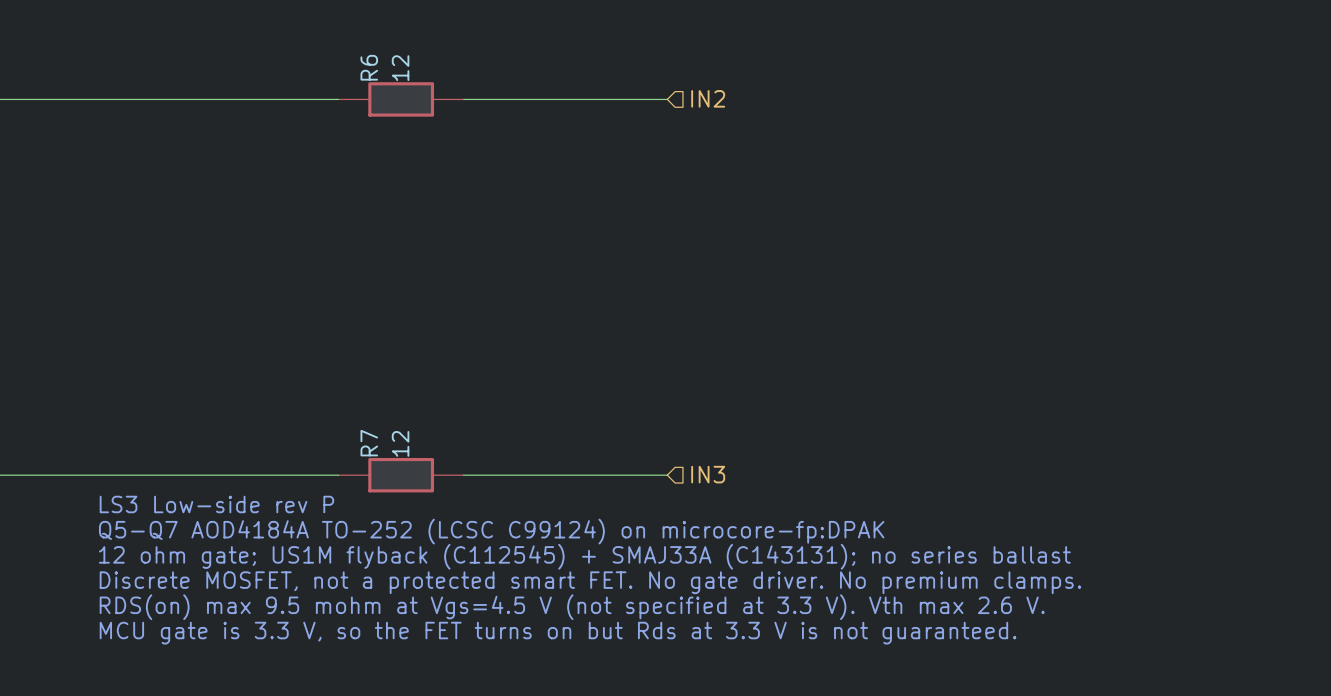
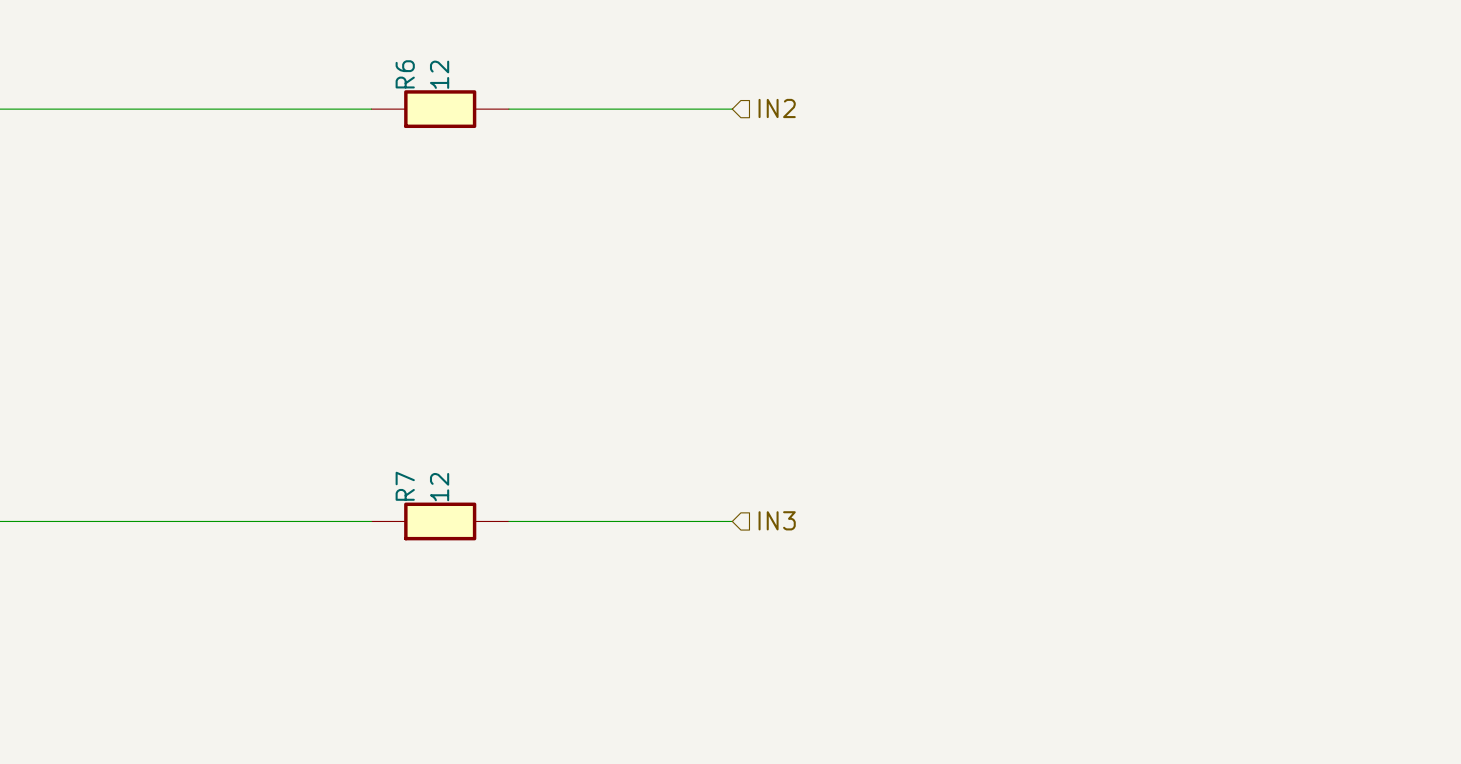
text: LS3 Low-side rev P (216, 504) -> none
text: Q5-Q7 AOD4184A TO-252 (LCSC C99124) on microcore-fp:DPAK (491, 531) -> none
text: 12 ohm gate; US1M flyback (C112545) + SMAJ33A (C143131); no series ballast (584, 556) -> none
text: Discrete MOSFET, not a protected smart FET. No gate driver. No premium clamps. (590, 582) -> none
text: RDS(on) max 9.5 mohm at Vgs=4.5 V (not specified at 3.3 V). Vth max 2.6 V. (572, 607) -> none
text: MCU gate is 3.3 V, so the FET turns on but Rds at 3.3 V is not guaranteed. (558, 633) -> none

